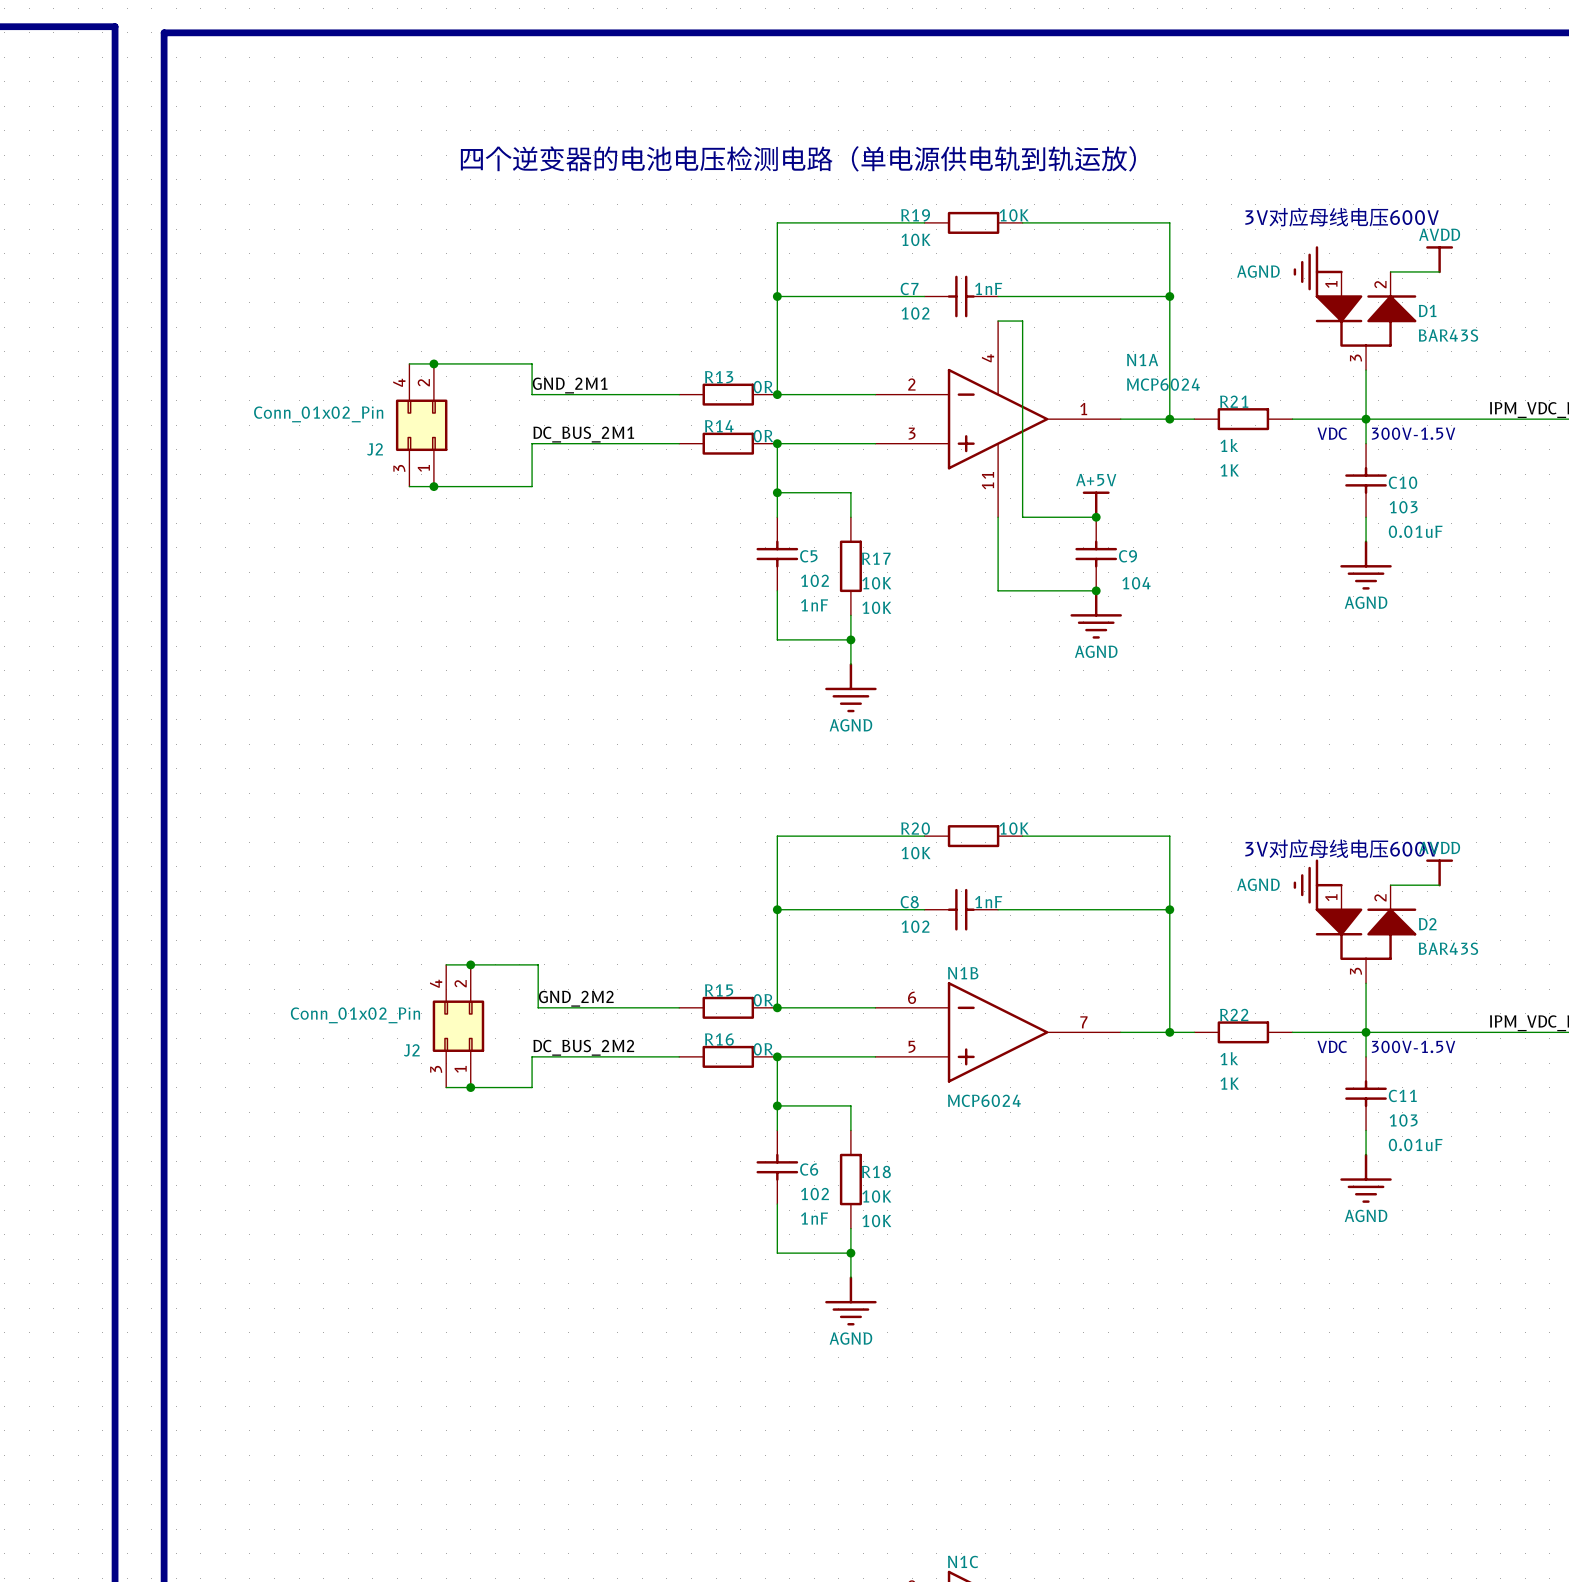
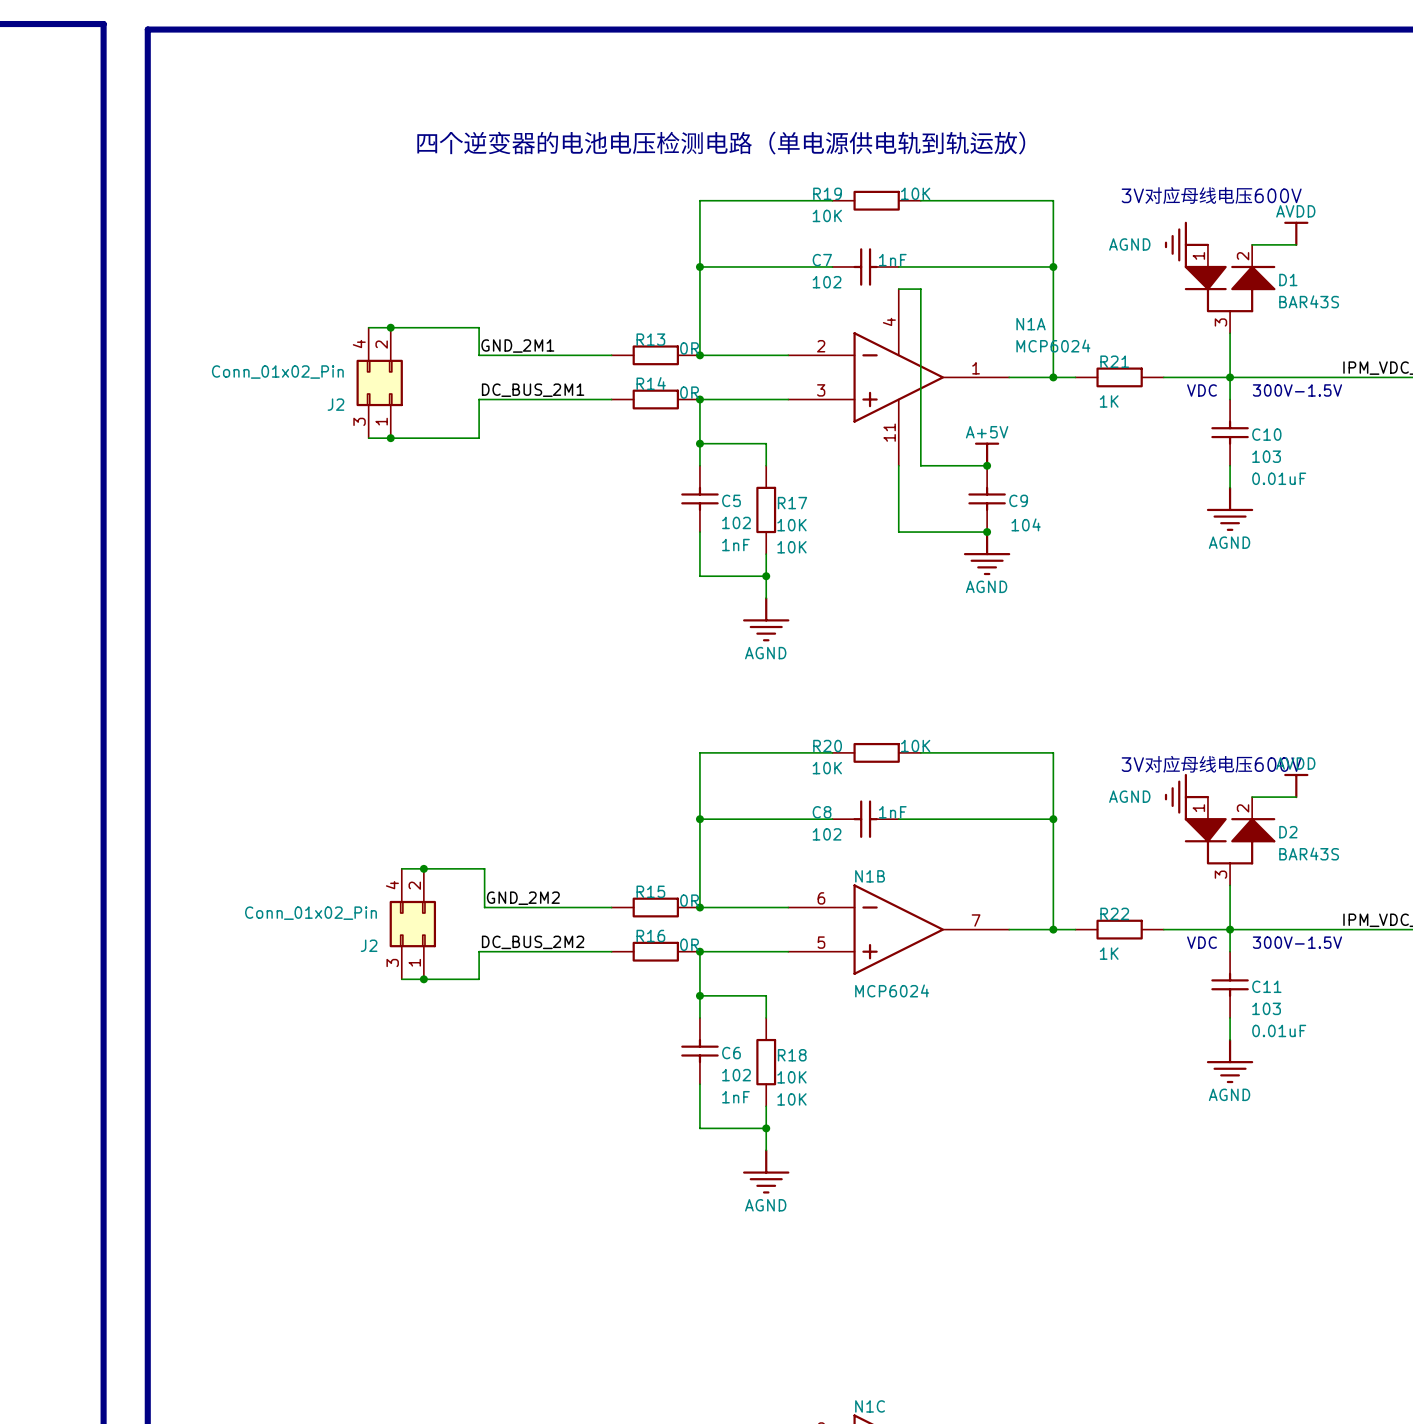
R21 value: 1k (1229, 445) -> 1K (1109, 401)
R21 text: 1K (1229, 470) -> none
R22 value: 1k (1229, 1058) -> 1K (1109, 953)
R22 text: 1K (1229, 1083) -> none

